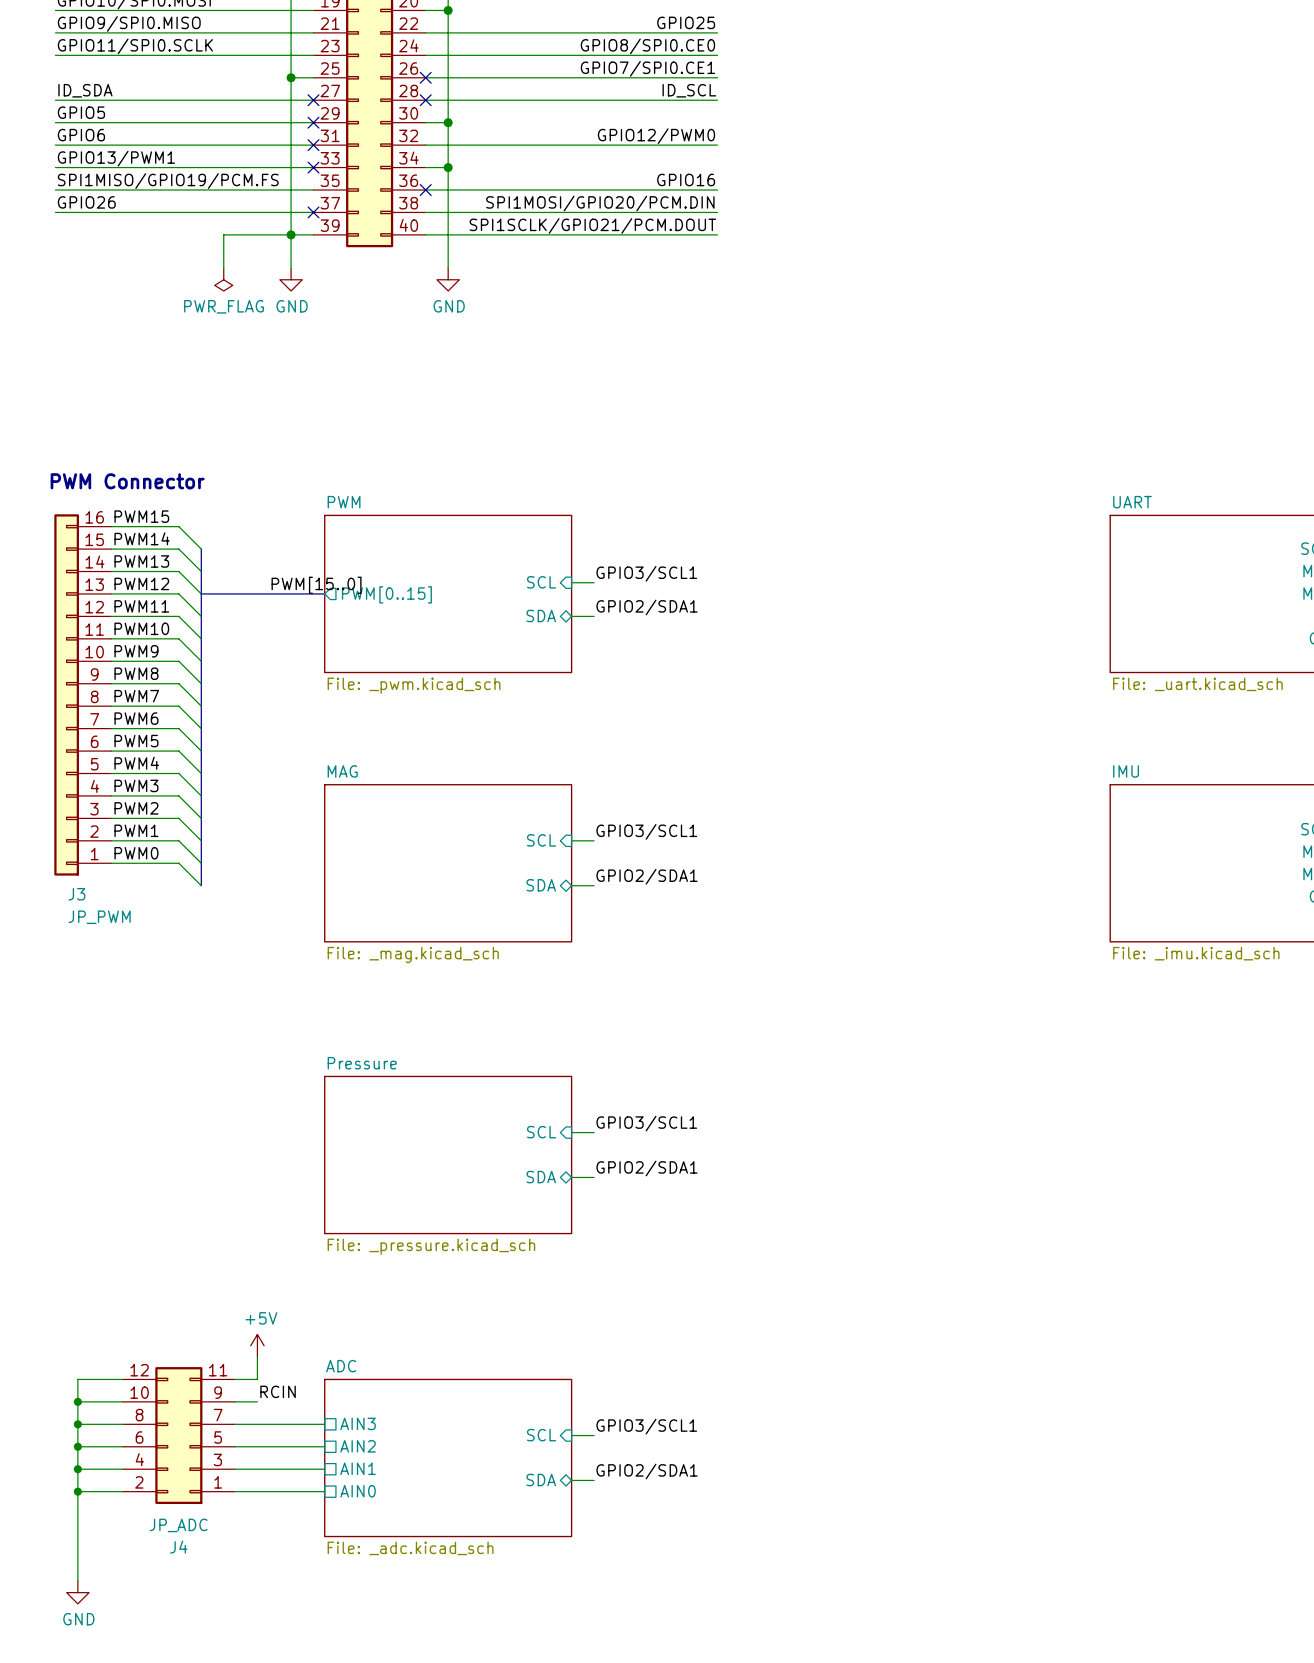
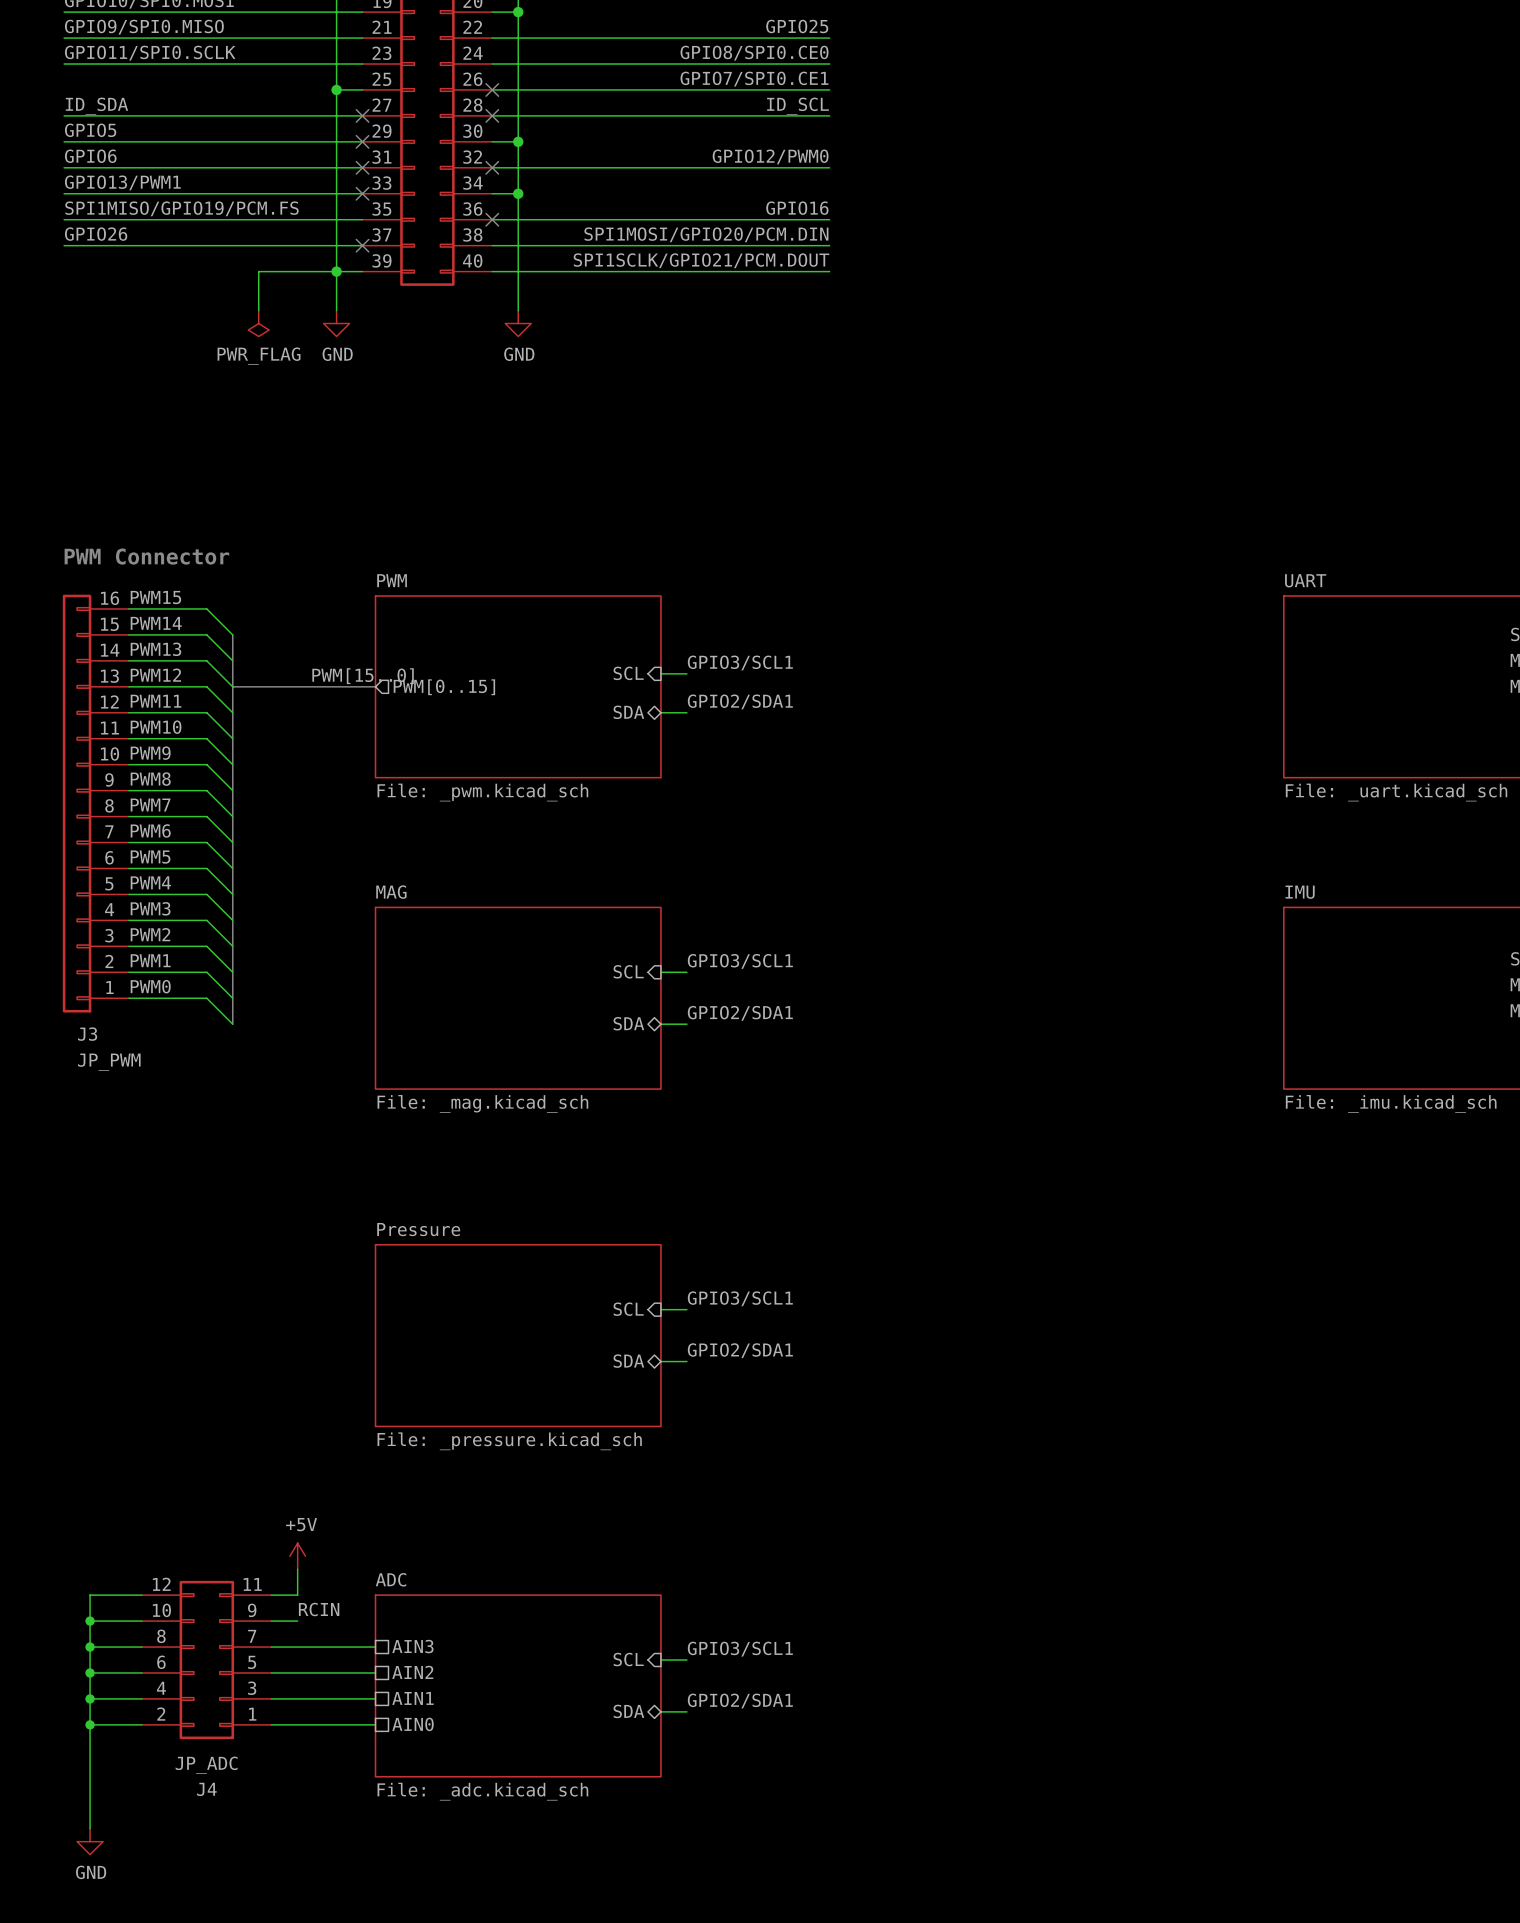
no-connect mark: none -> (492, 167)

